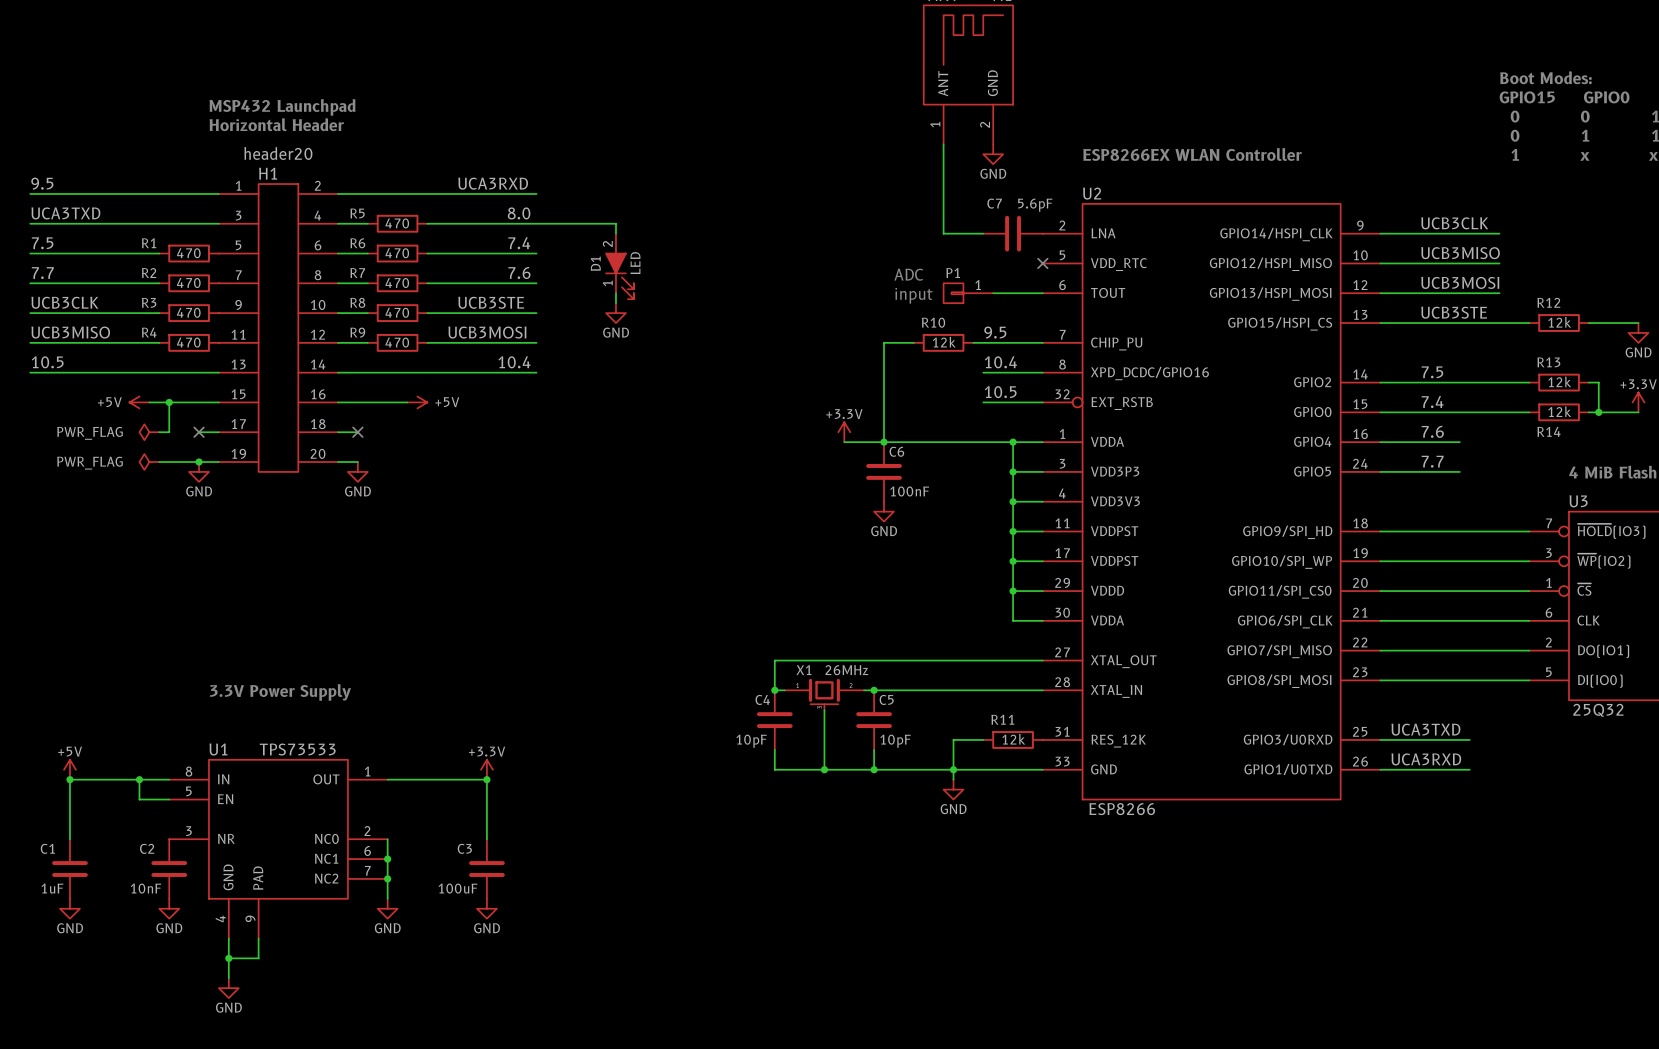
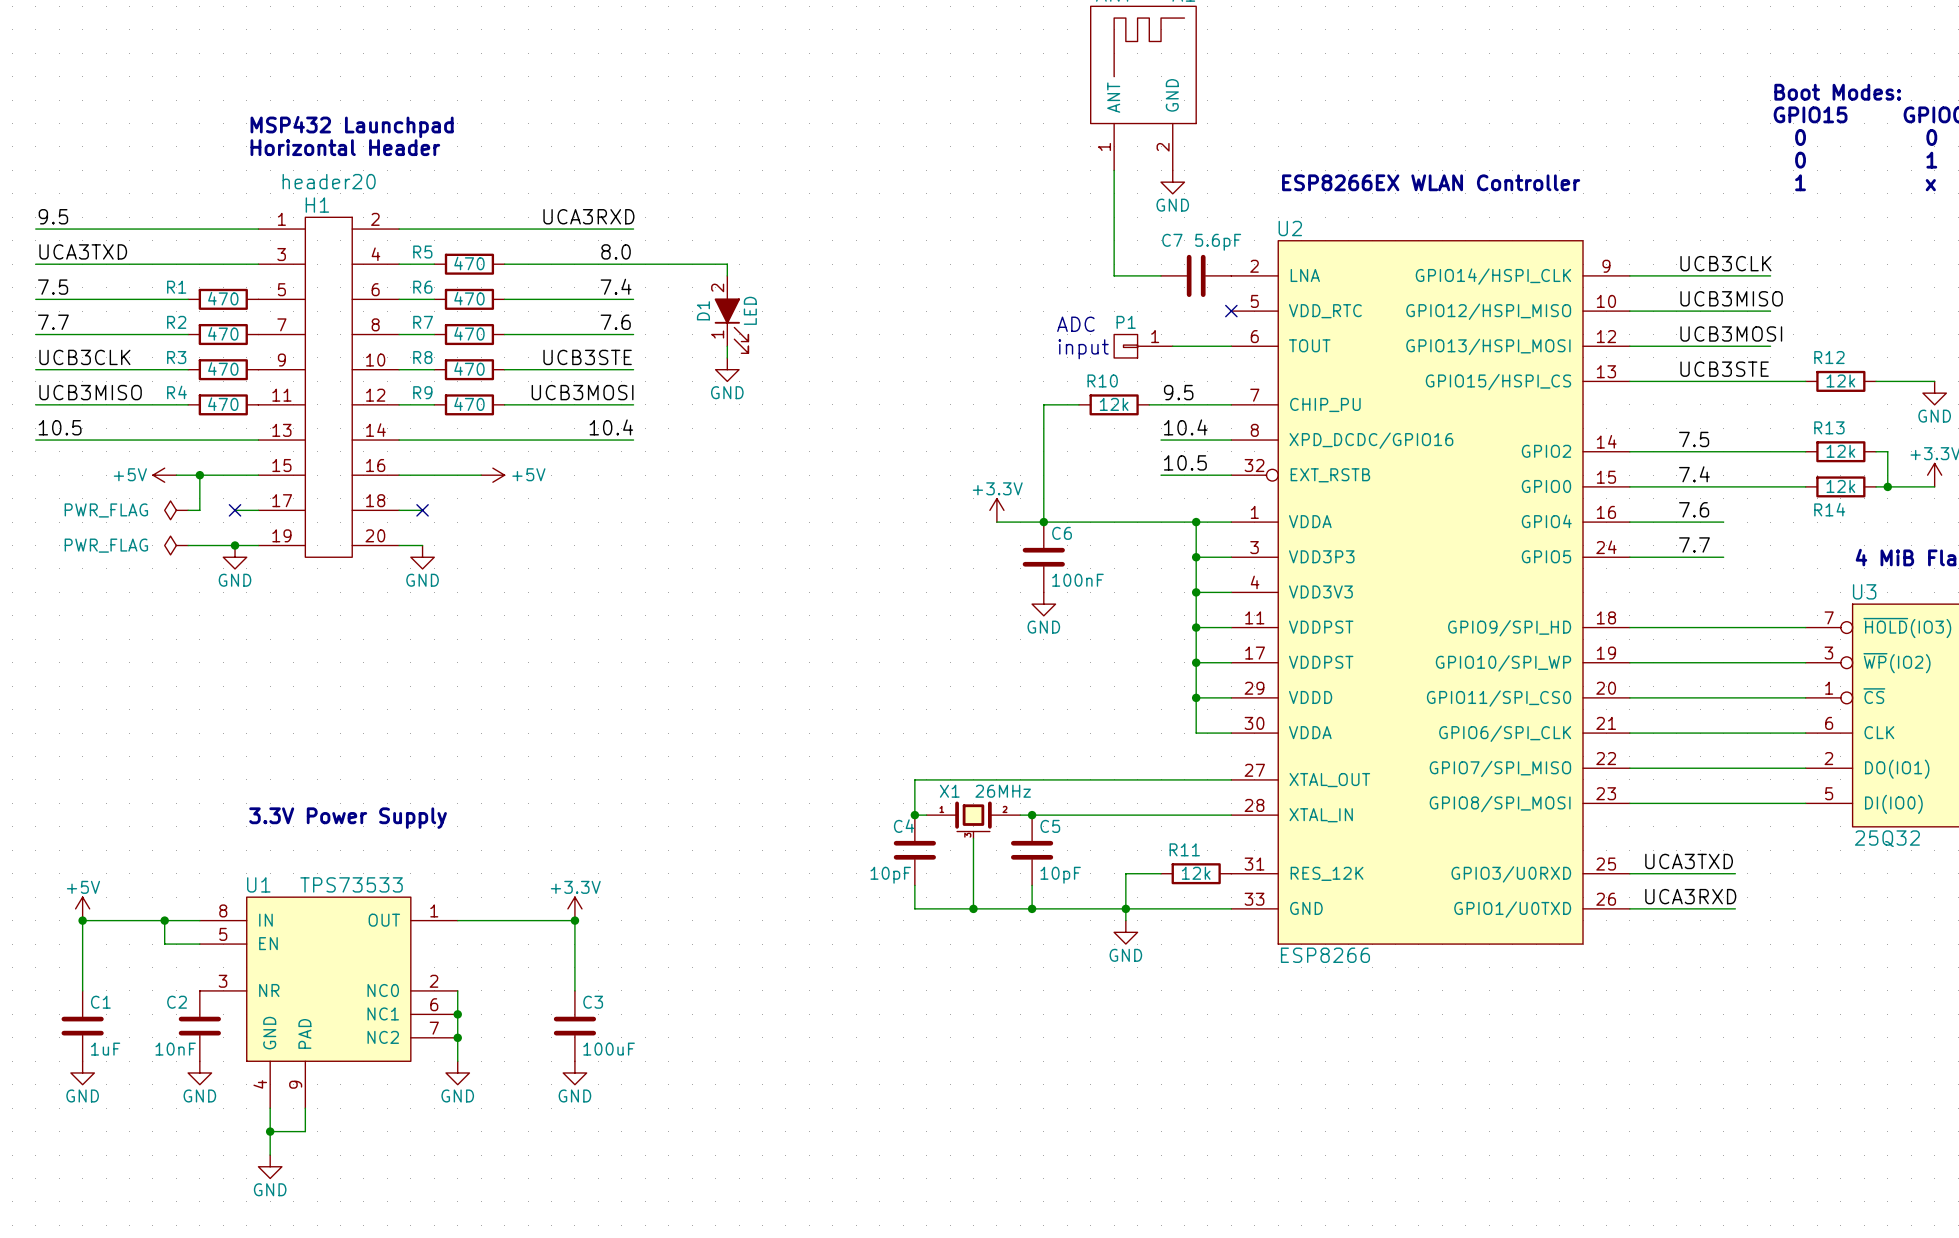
C1 name position: C1 (47, 848) -> C1 (100, 1002)
C3 name position: C3 (464, 848) -> C3 (593, 1002)
C1 value position: 1uF (52, 888) -> 1uF (105, 1049)
C3 value position: 100uF (458, 888) -> 100uF (609, 1049)

